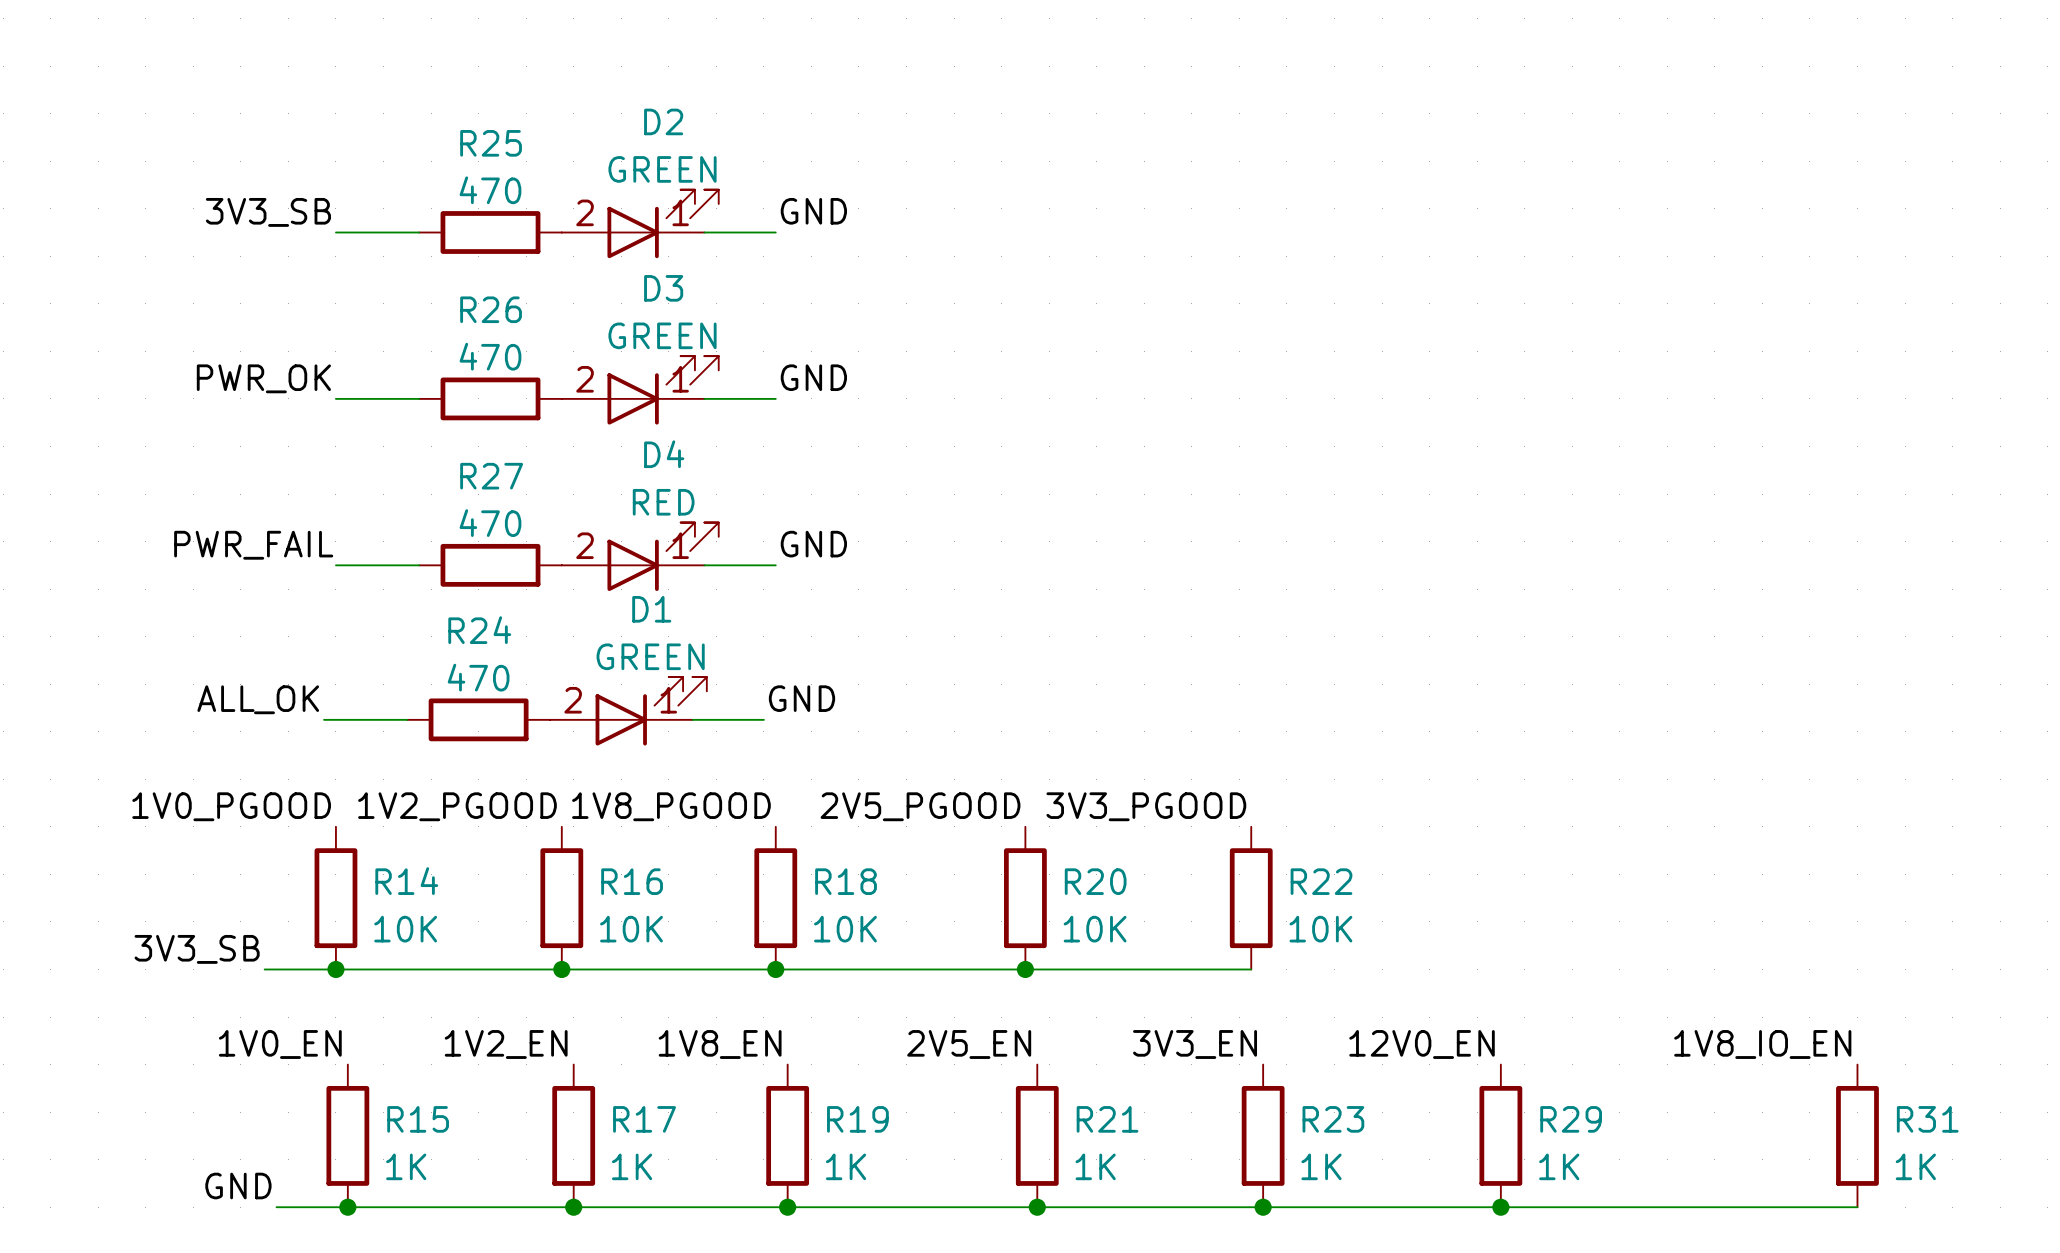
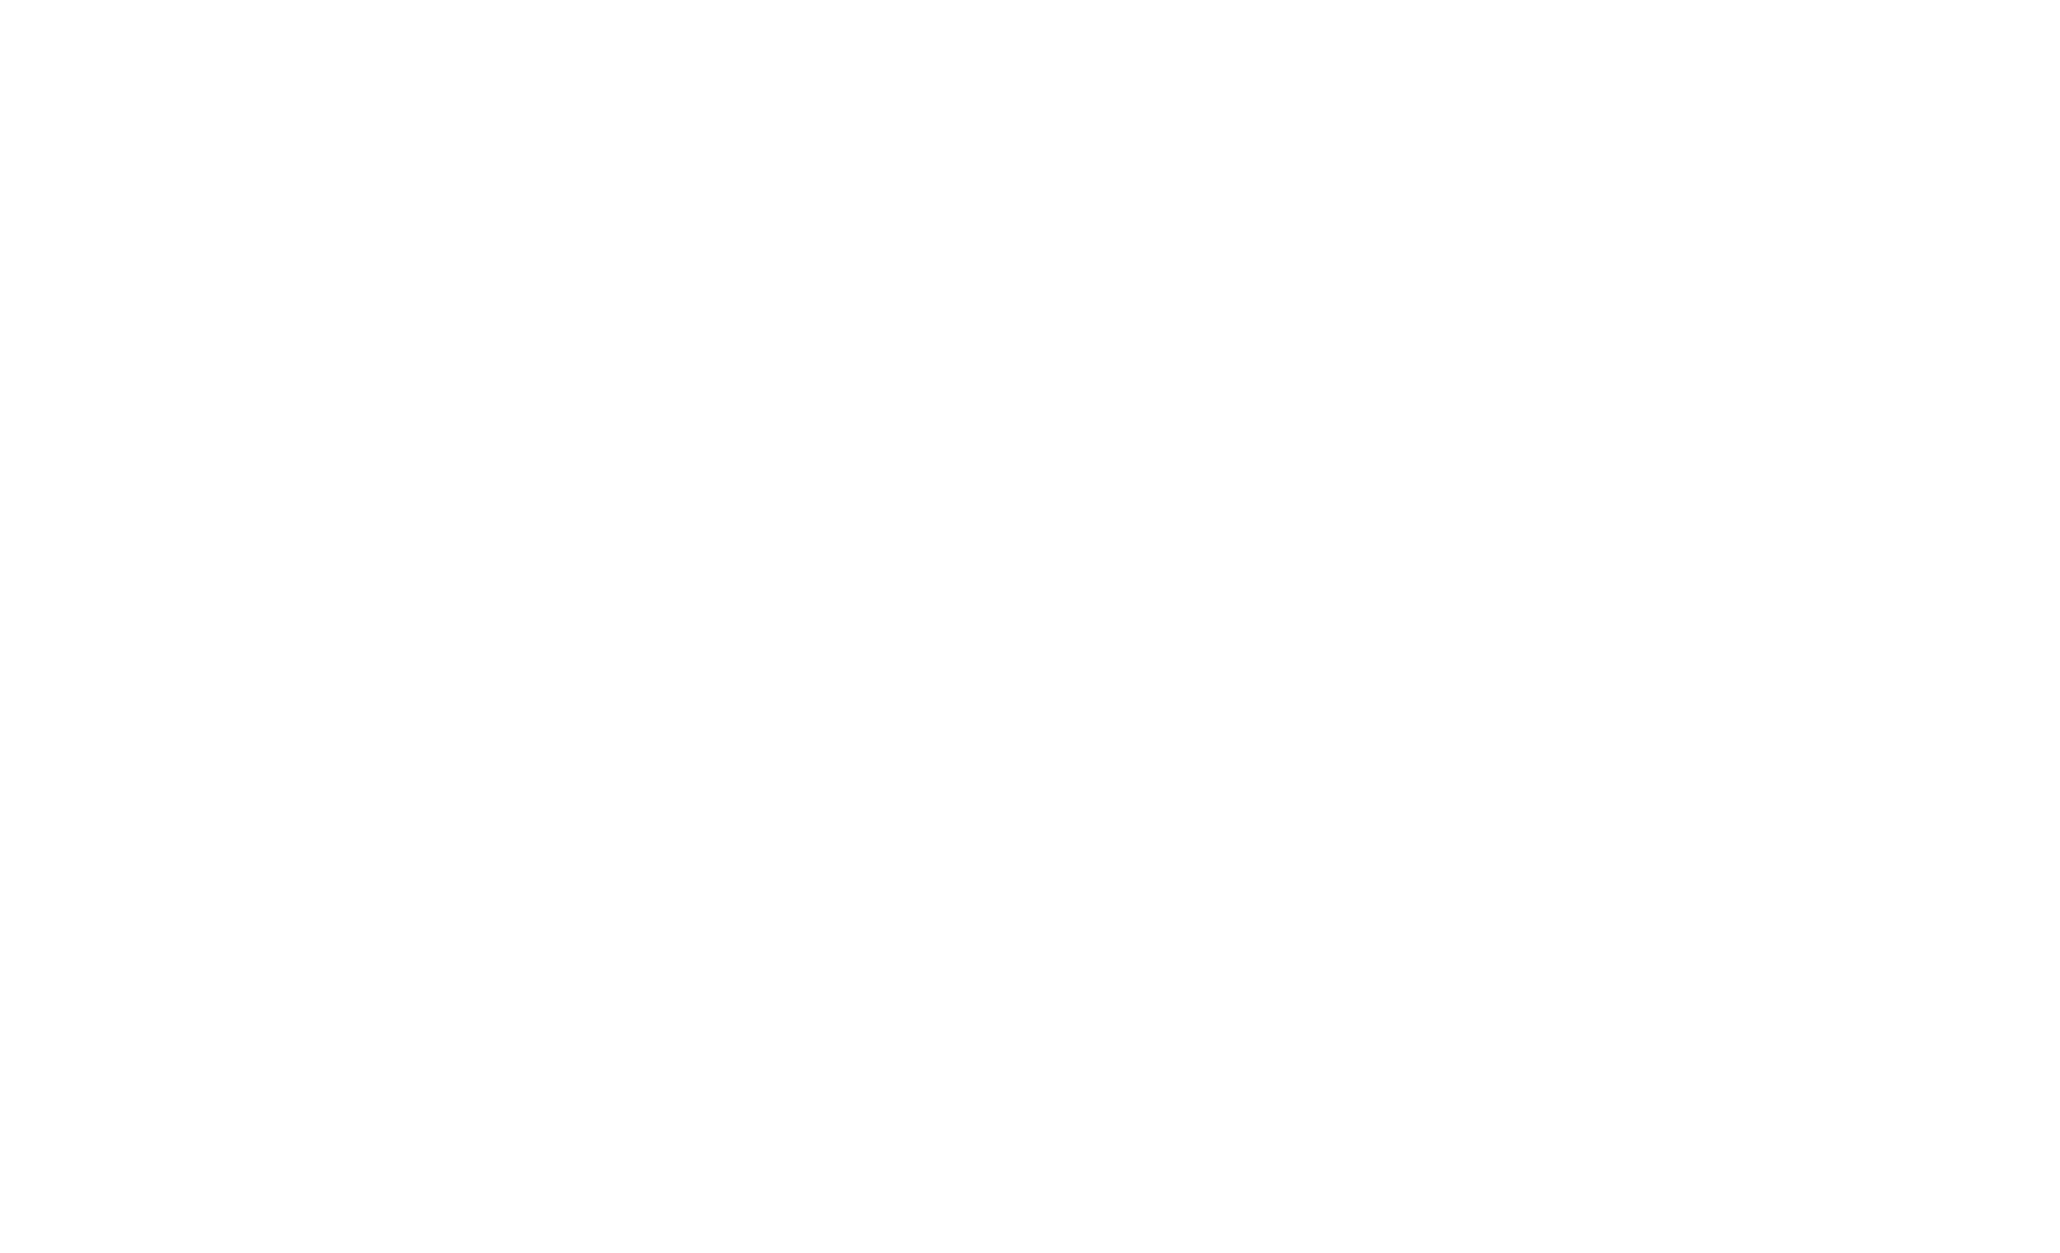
label: GND (813, 211) -> none
label: 3V3_SB (268, 212) -> none
D2: GREEN (640, 223) -> none
wire: (335, 232) (419, 232) -> none
R25: 470 (490, 232) -> none
wire: (704, 232) (775, 232) -> none
label: GND (813, 377) -> none
label: PWR_OK (263, 378) -> none
D3: GREEN (640, 390) -> none
wire: (335, 398) (419, 398) -> none
R26: 470 (490, 398) -> none
wire: (704, 398) (775, 398) -> none
label: GND (813, 544) -> none
label: PWR_FAIL (253, 545) -> none
D4: RED (640, 556) -> none
wire: (335, 565) (419, 565) -> none
R27: 470 (490, 565) -> none
wire: (704, 565) (775, 565) -> none
label: GND (801, 698) -> none
label: ALL_OK (258, 699) -> none
D1: GREEN (628, 711) -> none
wire: (324, 719) (407, 719) -> none
R24: 470 (478, 719) -> none
wire: (692, 719) (763, 719) -> none
label: 1V0_PGOOD (231, 806) -> none
label: 1V2_PGOOD (457, 806) -> none
label: 1V8_PGOOD (671, 806) -> none
label: 2V5_PGOOD (920, 806) -> none
label: 3V3_PGOOD (1146, 806) -> none
R14: 10K (335, 898) -> none
R16: 10K (561, 898) -> none
R18: 10K (775, 898) -> none
R20: 10K (1025, 898) -> none
R22: 10K (1251, 898) -> none
label: 3V3_SB (197, 949) -> none
wire: (264, 969) (1251, 969) -> none
junction: (335, 969) -> none
junction: (561, 969) -> none
junction: (775, 969) -> none
junction: (1025, 969) -> none
label: 1V0_EN (280, 1044) -> none
label: 1V2_EN (506, 1044) -> none
label: 1V8_EN (720, 1044) -> none
label: 2V5_EN (969, 1044) -> none
label: 3V3_EN (1195, 1044) -> none
label: 12V0_EN (1422, 1044) -> none
label: 1V8_IO_EN (1762, 1044) -> none
R15: 1K (347, 1135) -> none
R17: 1K (573, 1135) -> none
R19: 1K (787, 1135) -> none
R21: 1K (1037, 1135) -> none
R23: 1K (1263, 1135) -> none
R29: 1K (1500, 1135) -> none
R31: 1K (1857, 1135) -> none
label: GND (238, 1186) -> none
wire: (276, 1207) (1857, 1207) -> none
junction: (347, 1207) -> none
junction: (573, 1207) -> none
junction: (787, 1207) -> none
junction: (1037, 1207) -> none
junction: (1263, 1207) -> none
junction: (1500, 1207) -> none

